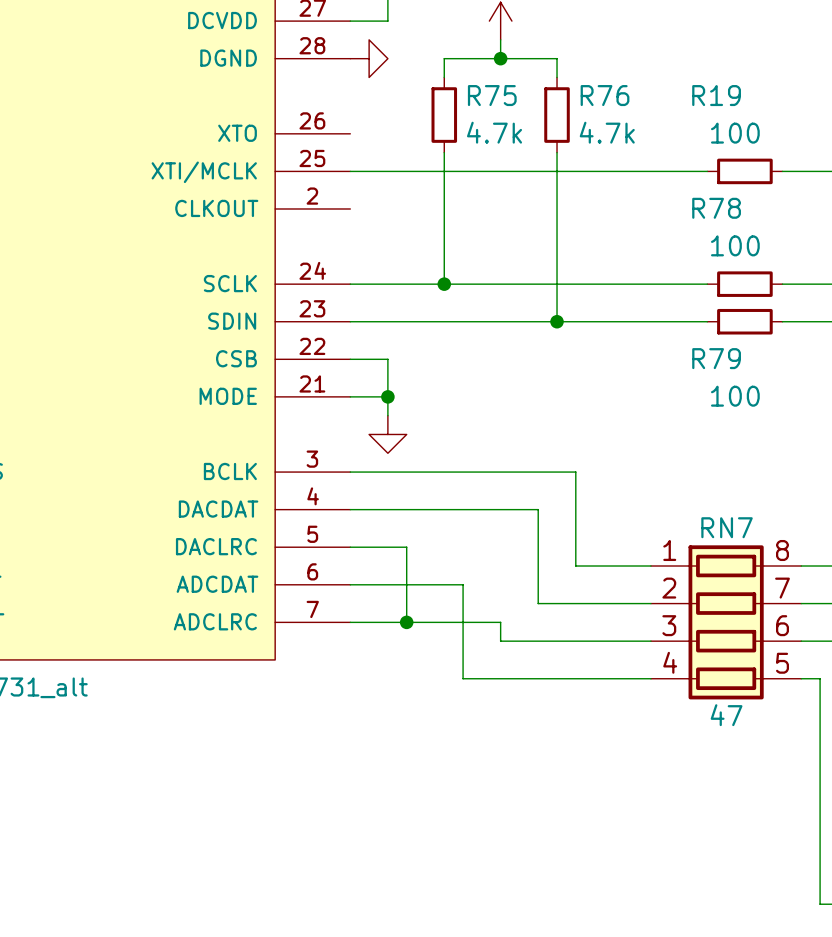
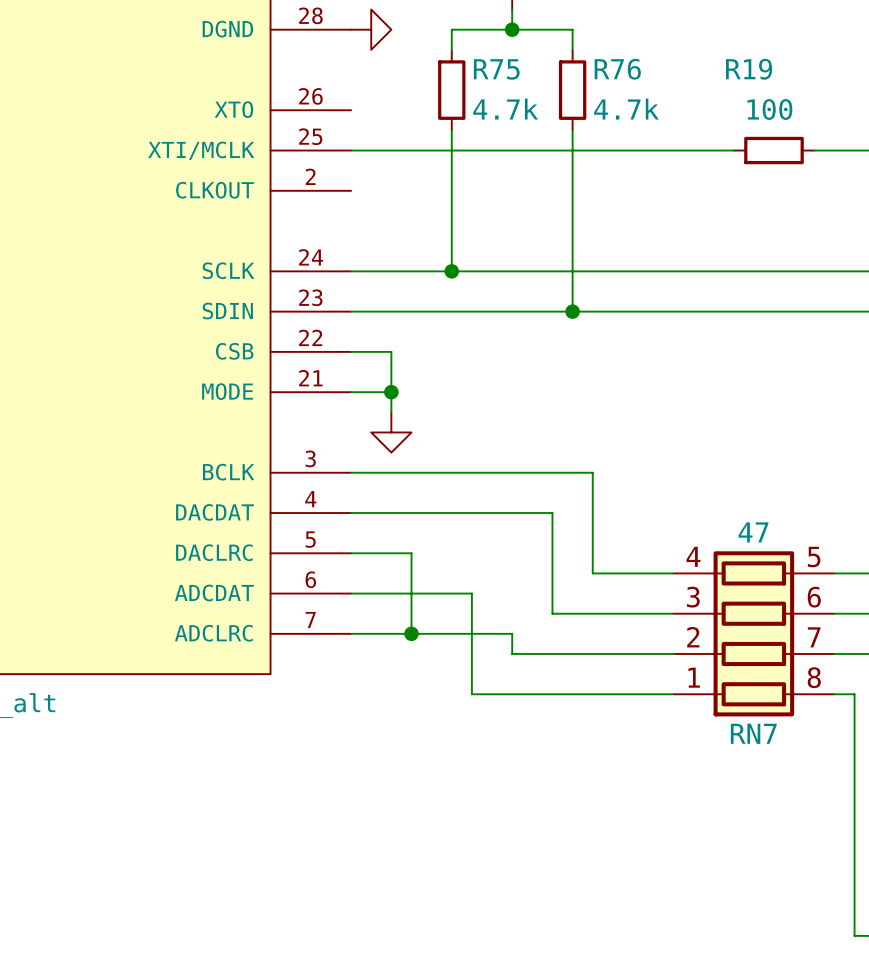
wire: none -> (733, 271) (814, 271)
R78: 100 (744, 284) -> none
wire: none -> (733, 311) (814, 311)
R79: 100 (744, 321) -> none
RN7 flip: as is (726, 622) -> up-down (753, 633)

